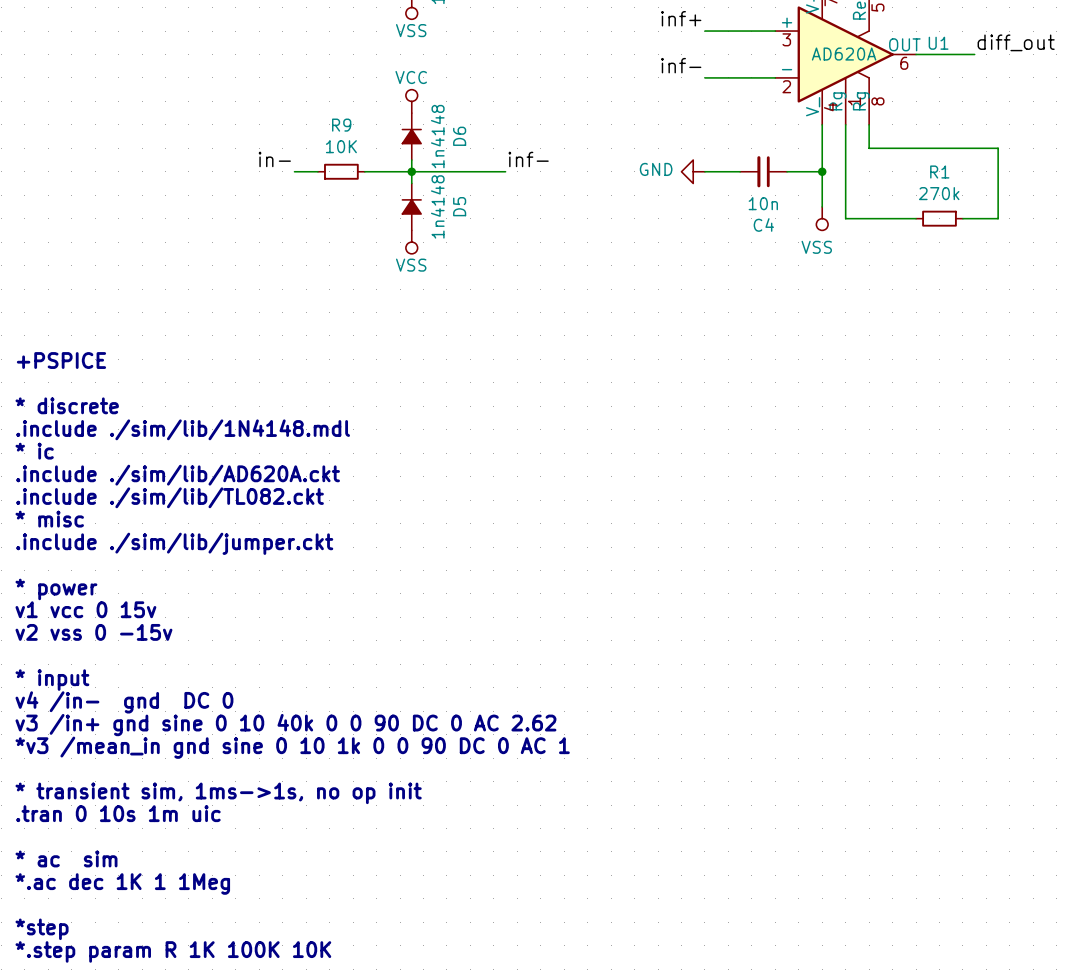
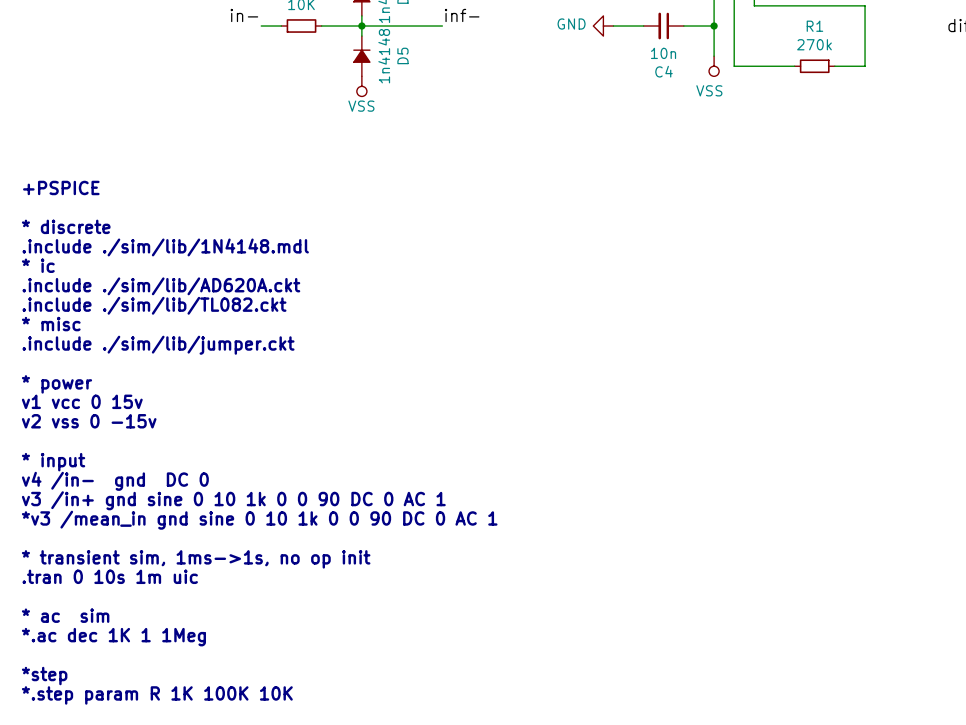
text: v3 /in+ gnd sine 0 10 40k 0 0 90 DC 0 AC 2.62 (285, 725) -> v3 /in+ gnd sine 0 10 1k 0 0 90 DC 0 AC 1 (233, 500)

